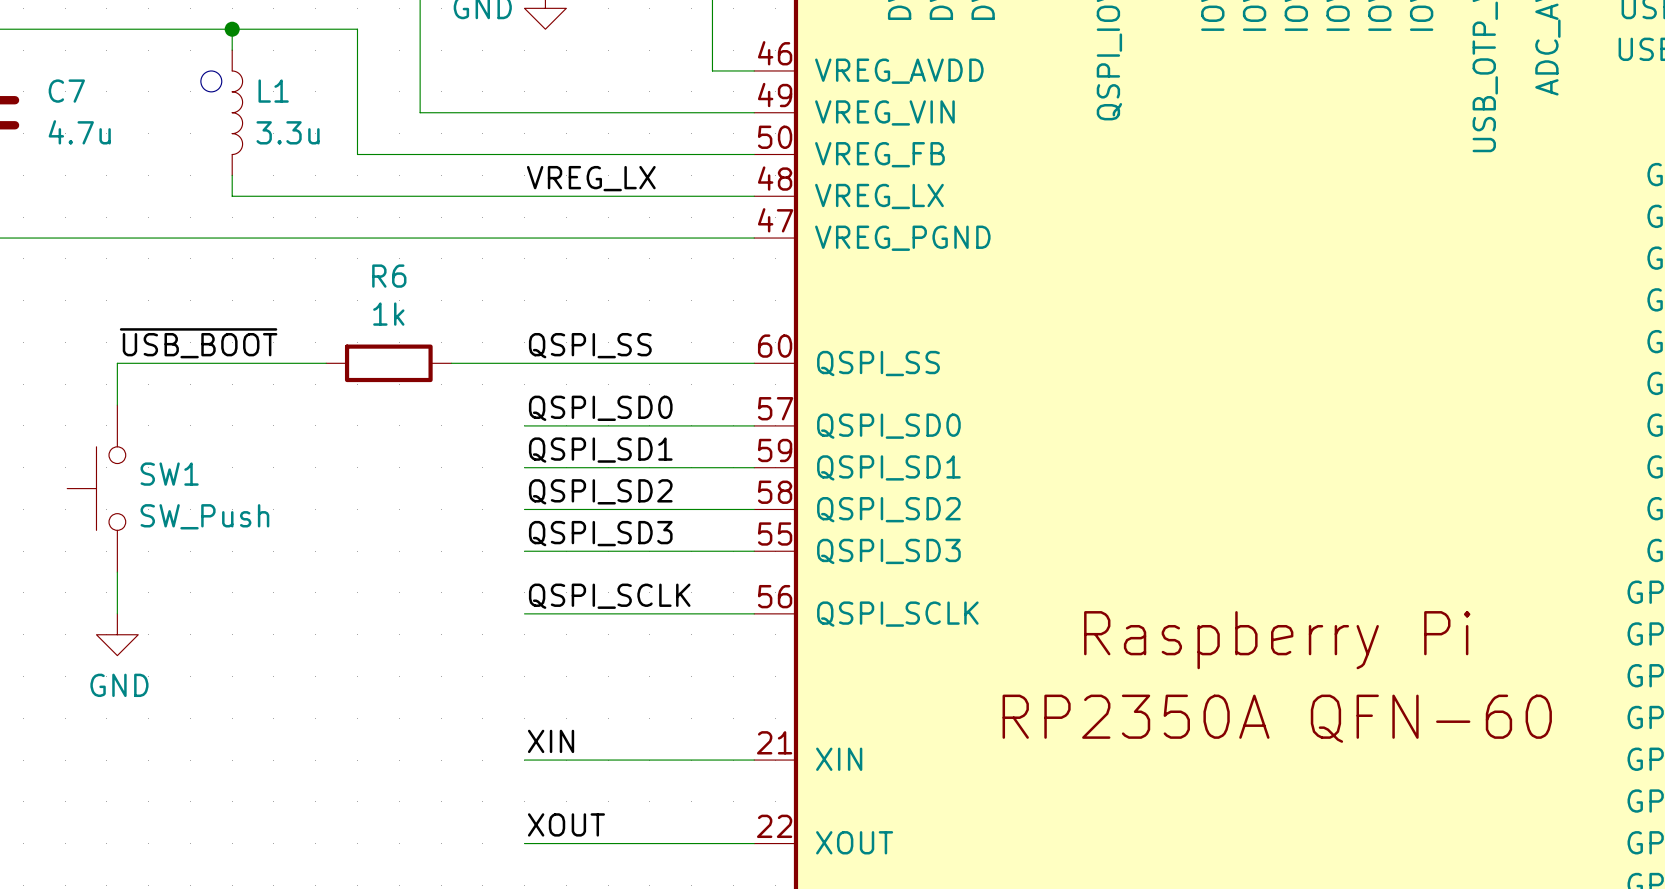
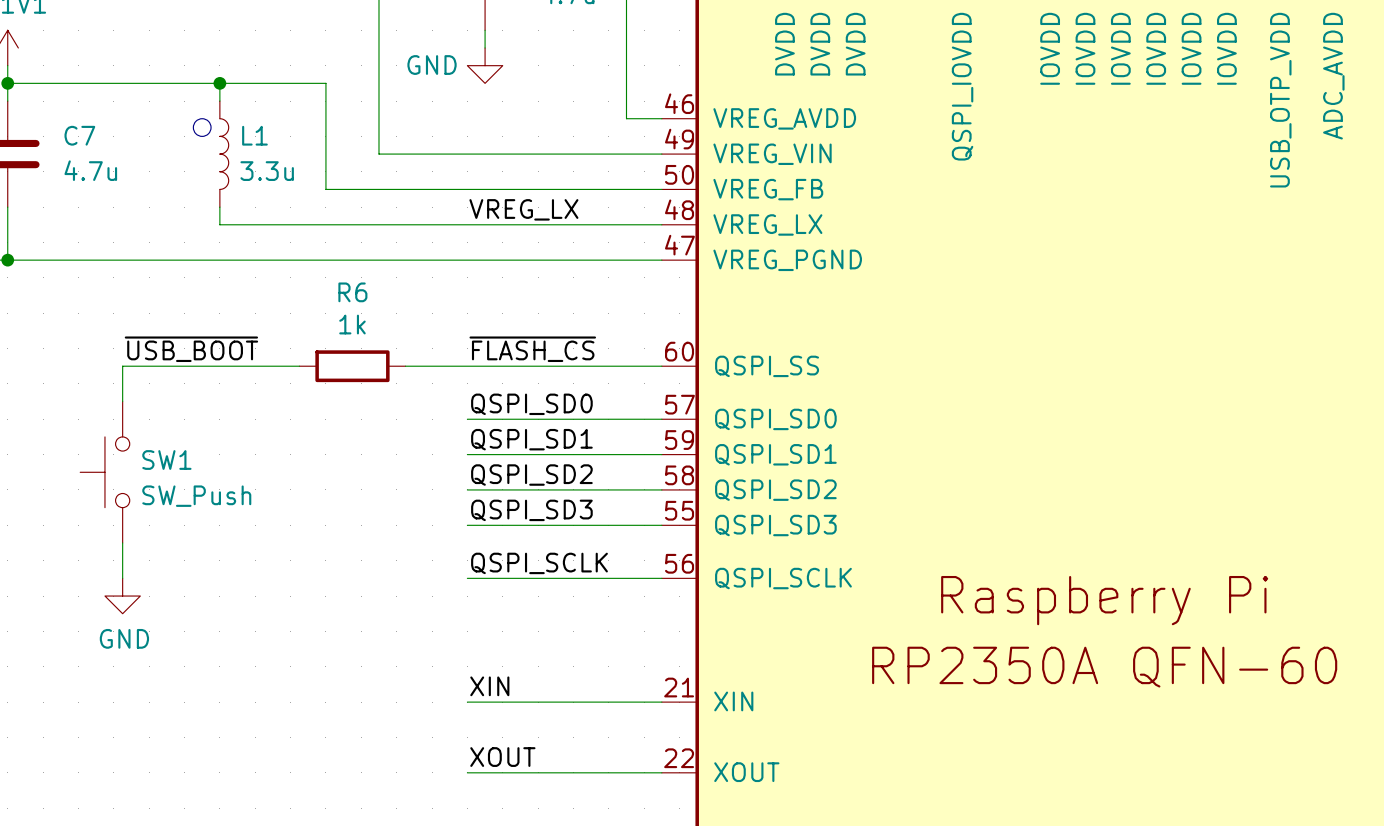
label: QSPI_SS (590, 345) -> ~{FLASH_CS} (532, 349)

